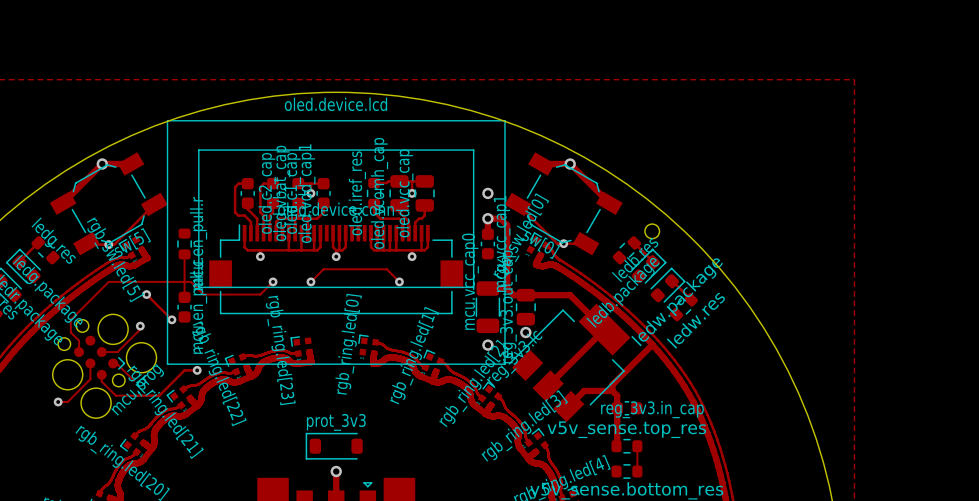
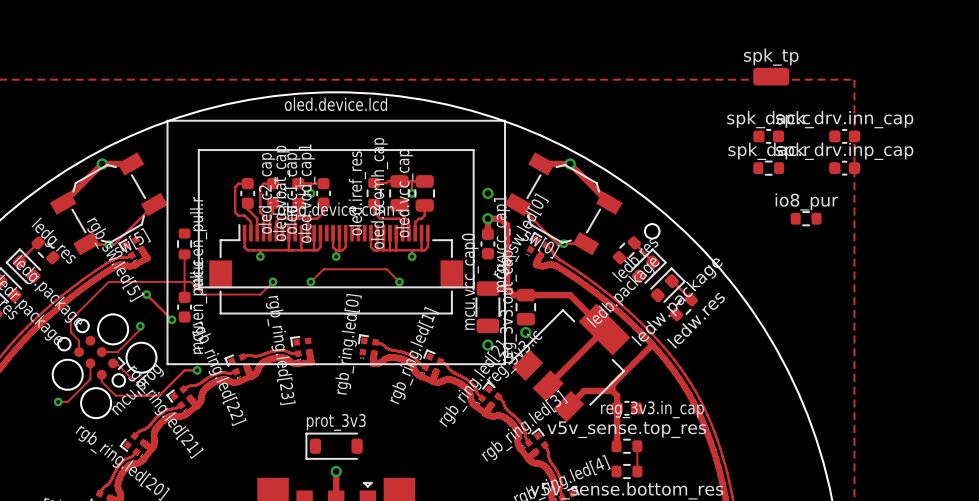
spk_tp: none -> (771, 76)
spk_dac.c: none -> (768, 136)
spk_drv.inn_cap: none -> (844, 136)
spk_dac.r: none -> (768, 168)
spk_drv.inp_cap: none -> (844, 168)
io8_pur: none -> (806, 218)

